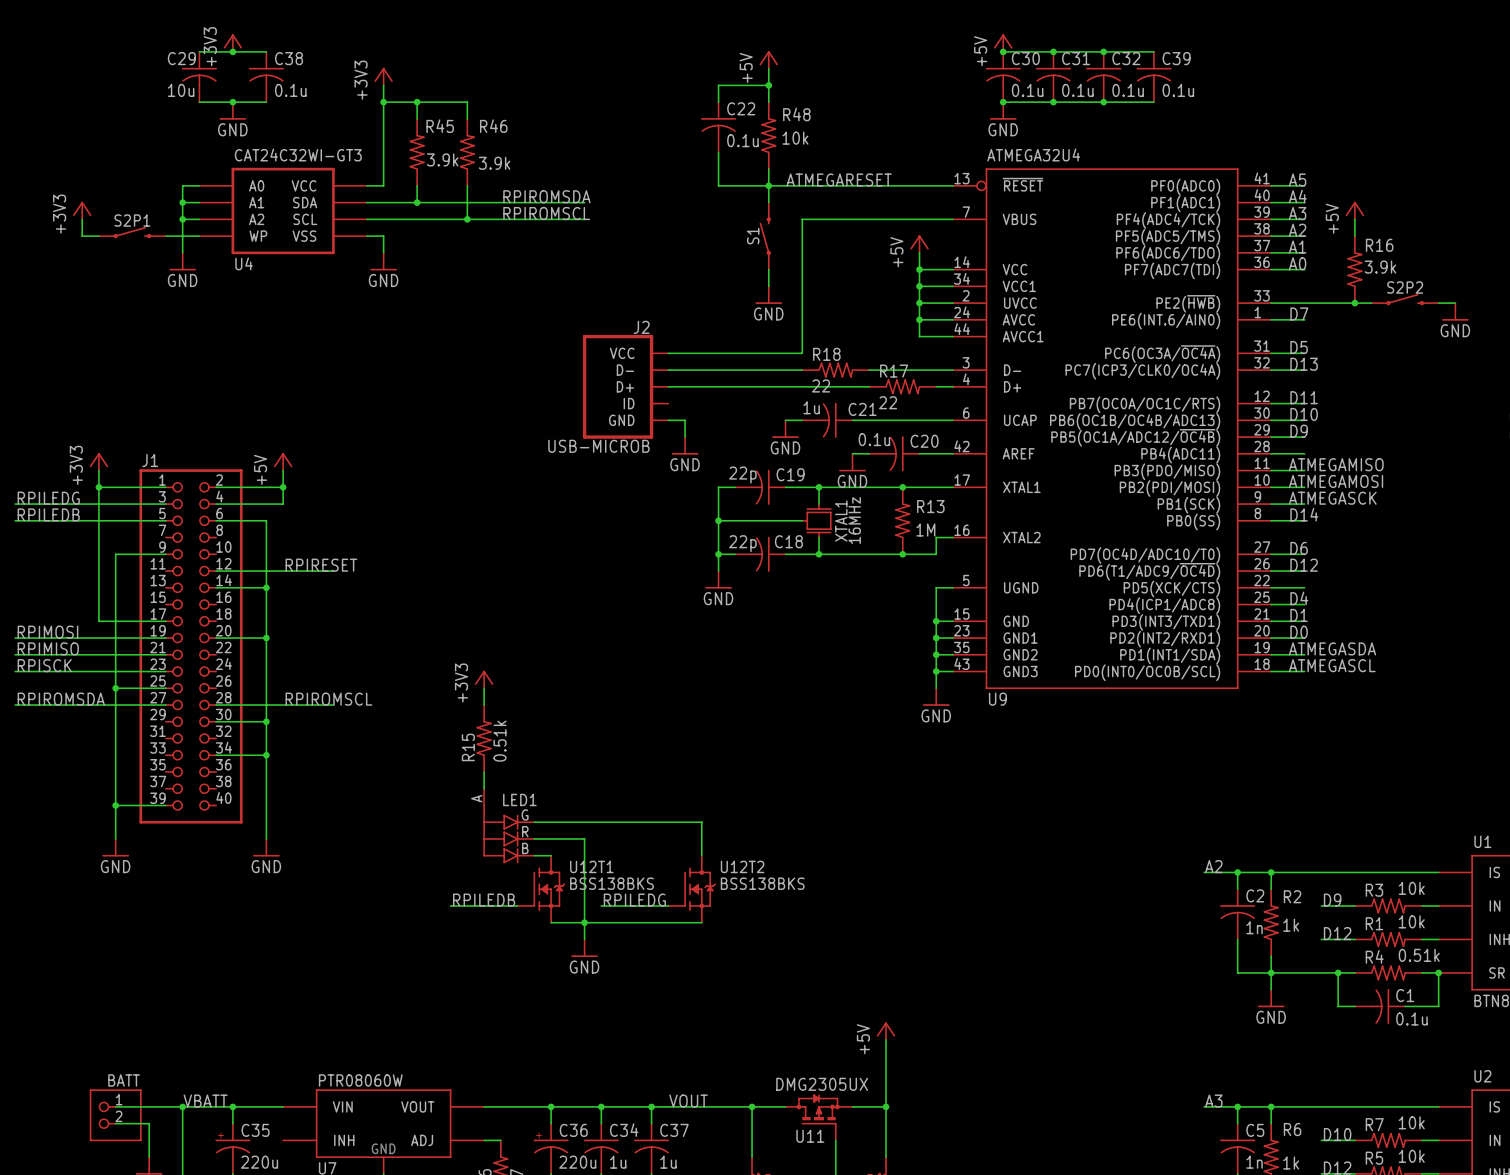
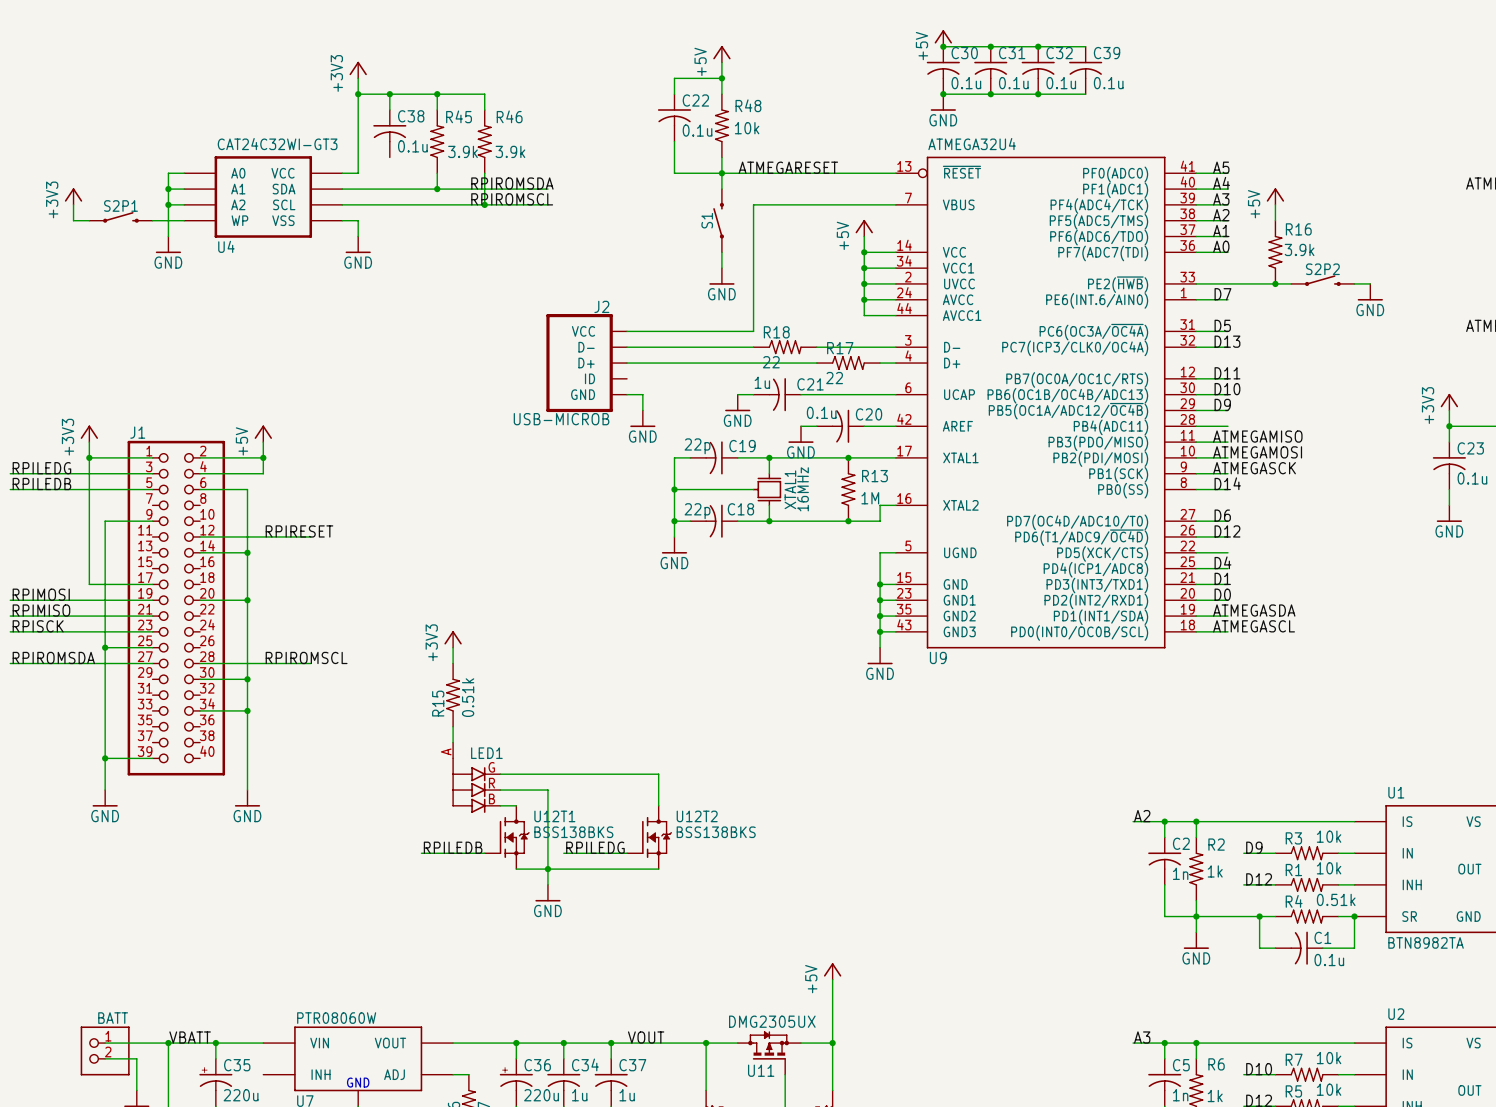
power symbol: +3V3 (232, 43) -> none
wire: (199, 51) (266, 51) -> none
junction: (232, 51) -> none
C29: 10u (199, 77) -> none
C38 position: (266, 77) -> (389, 133)
wire: (199, 102) (266, 102) -> none
junction: (232, 102) -> none
wire: none -> (437, 94) (484, 94) (484, 110)
junction: none -> (437, 94)
power symbol: GND (232, 110) -> none
R46 name: R46 (493, 126) -> R45 (459, 116)
R45: 3.9k (417, 152) -> none
R46: none -> 3.9k (484, 141)
wire: (417, 185) (417, 202) -> none
wire: none -> (484, 173) (484, 204)
junction: (417, 202) -> none
wire: (467, 202) (467, 219) -> none
junction position: (467, 219) -> (437, 189)
junction: none -> (484, 204)

